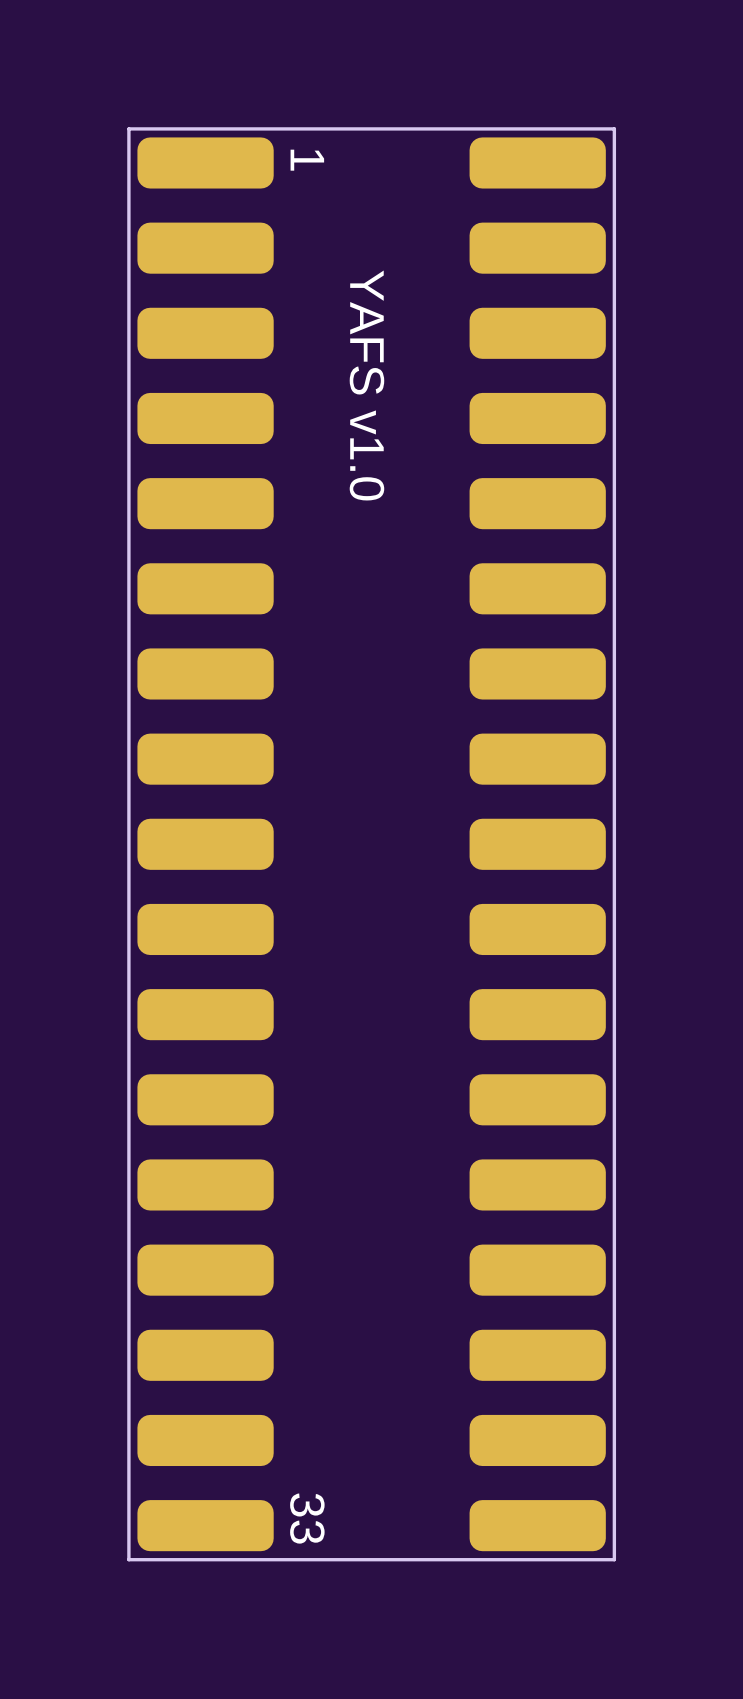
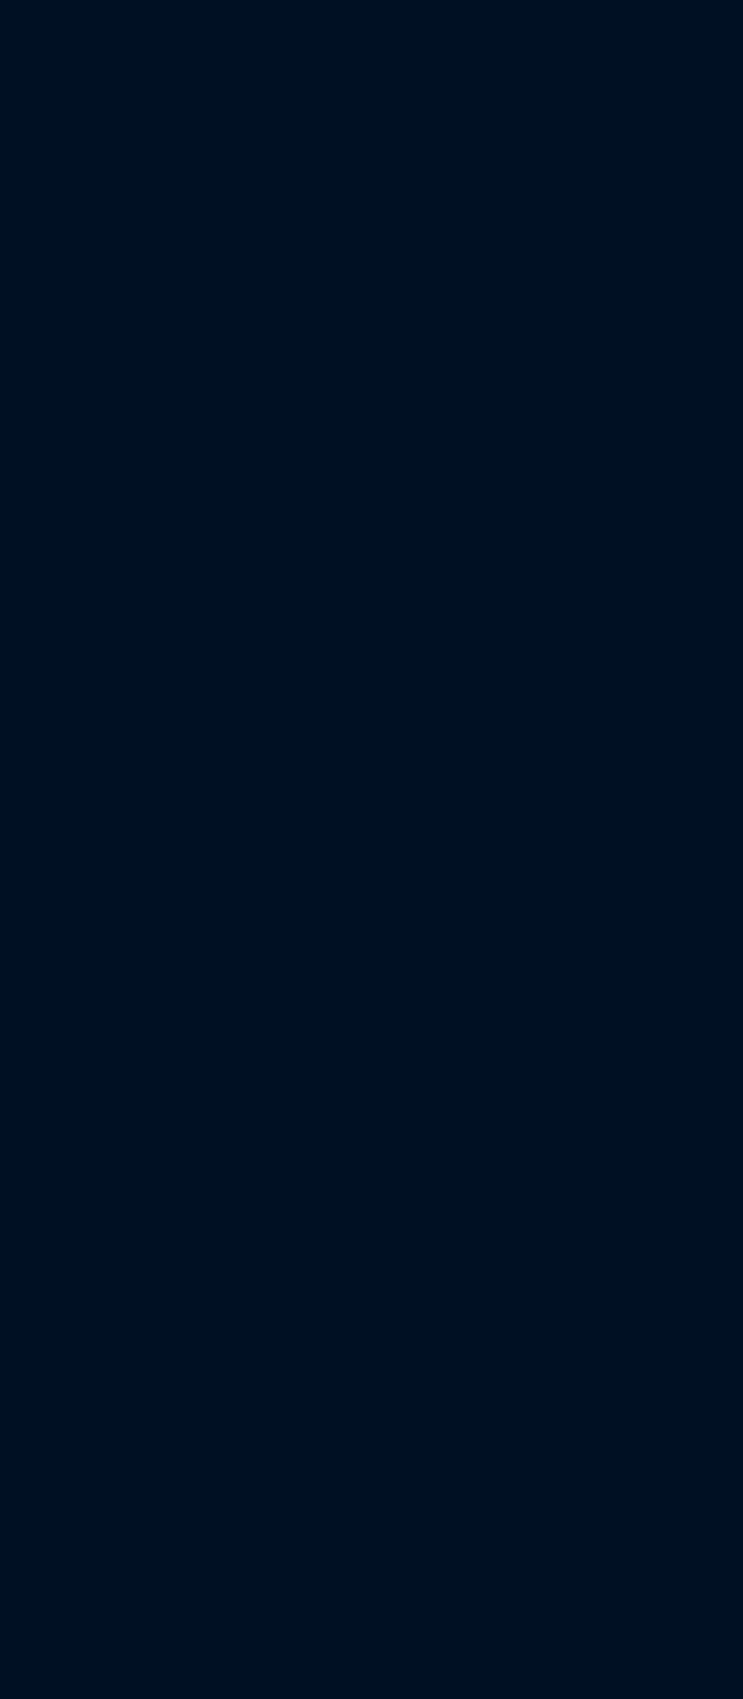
board edge: (614, 128) (614, 1559) (128, 1559) (128, 128) (614, 128) -> none
text: 1 (307, 160) -> none
text: YAFS v1.0 (366, 385) -> none
part: (205, 844) -> none
part: (537, 844) -> none
text: 33 (307, 1518) -> none

